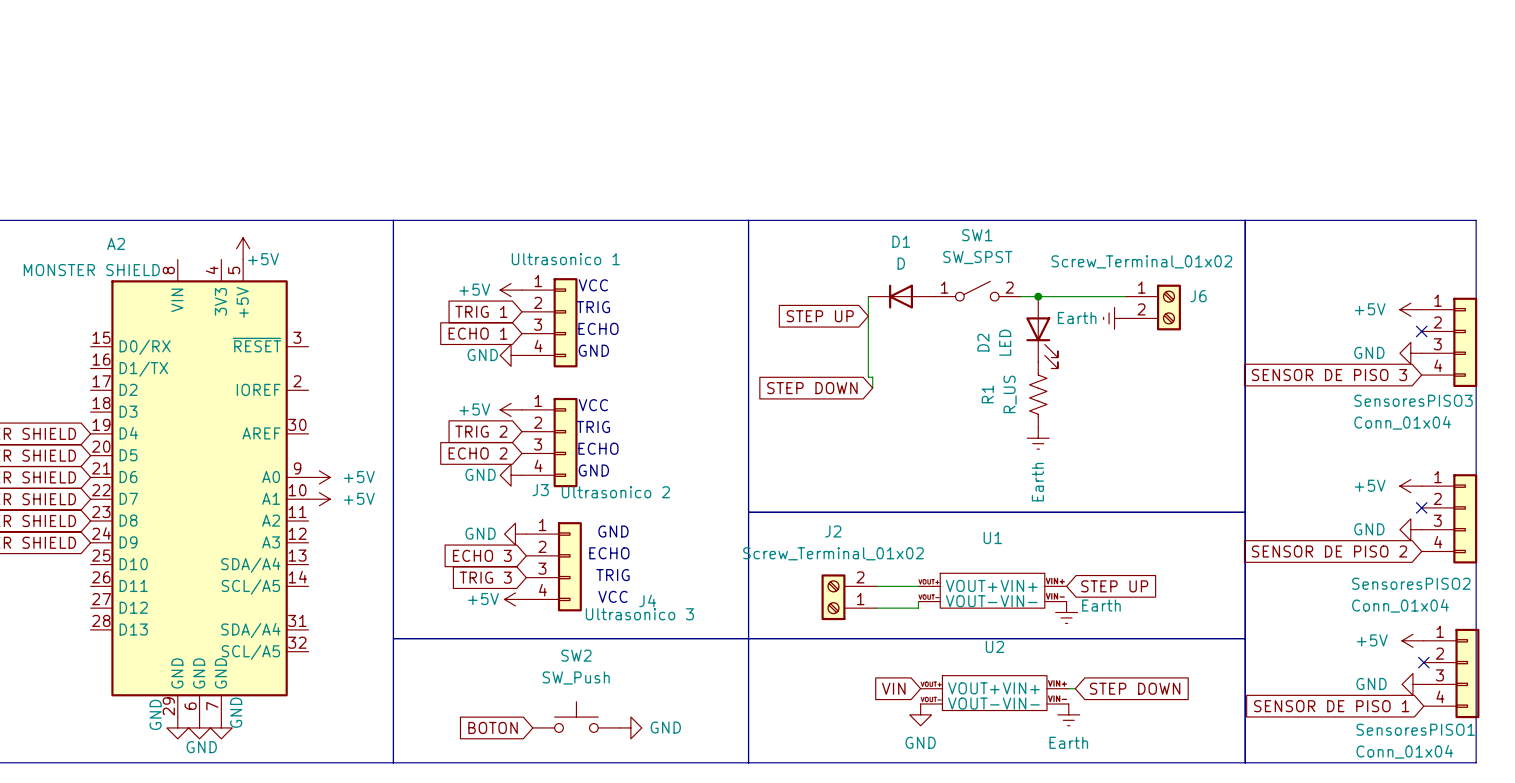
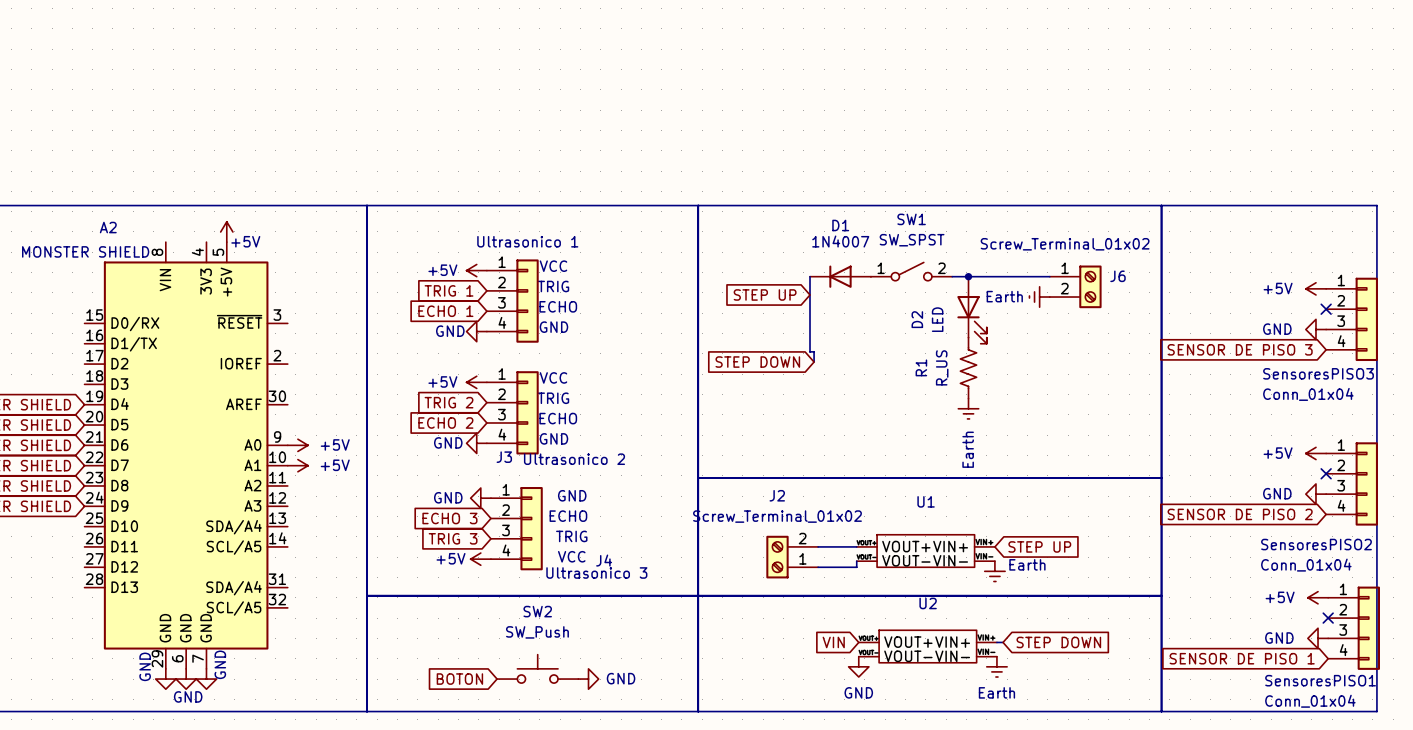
D1 value: D (901, 263) -> 1N4007 (840, 241)

